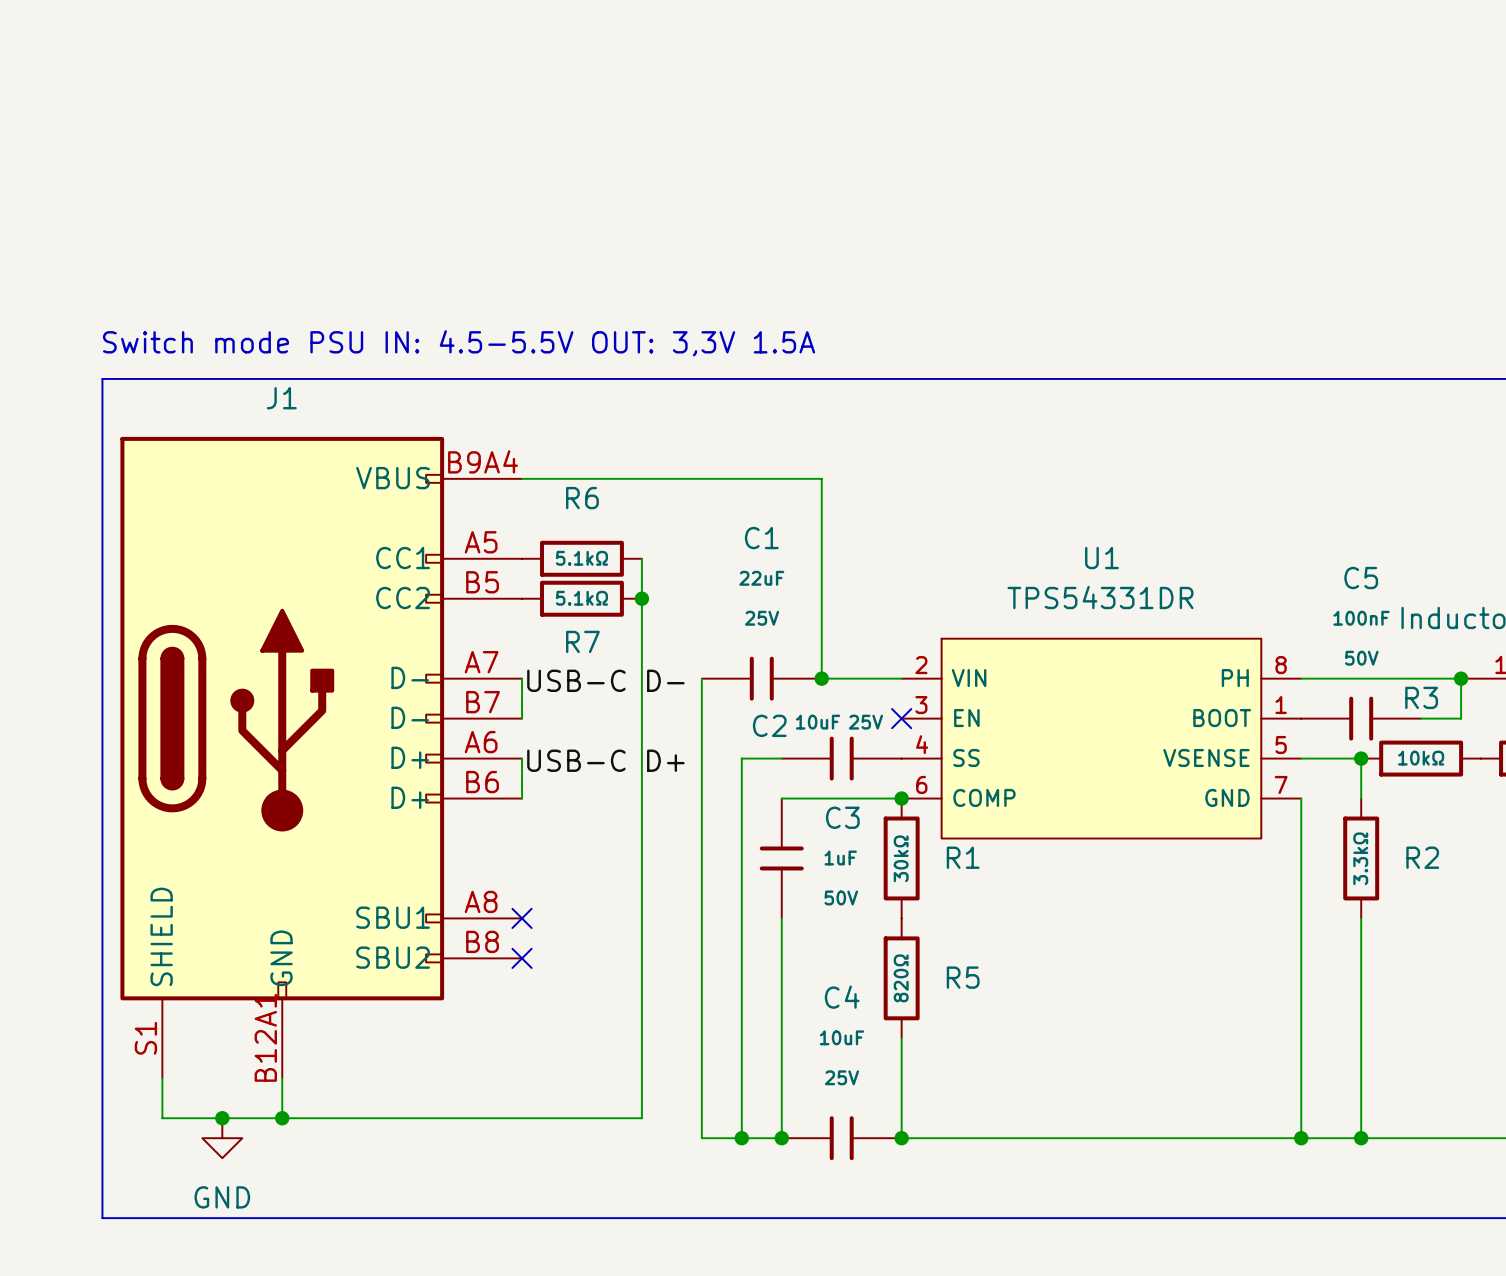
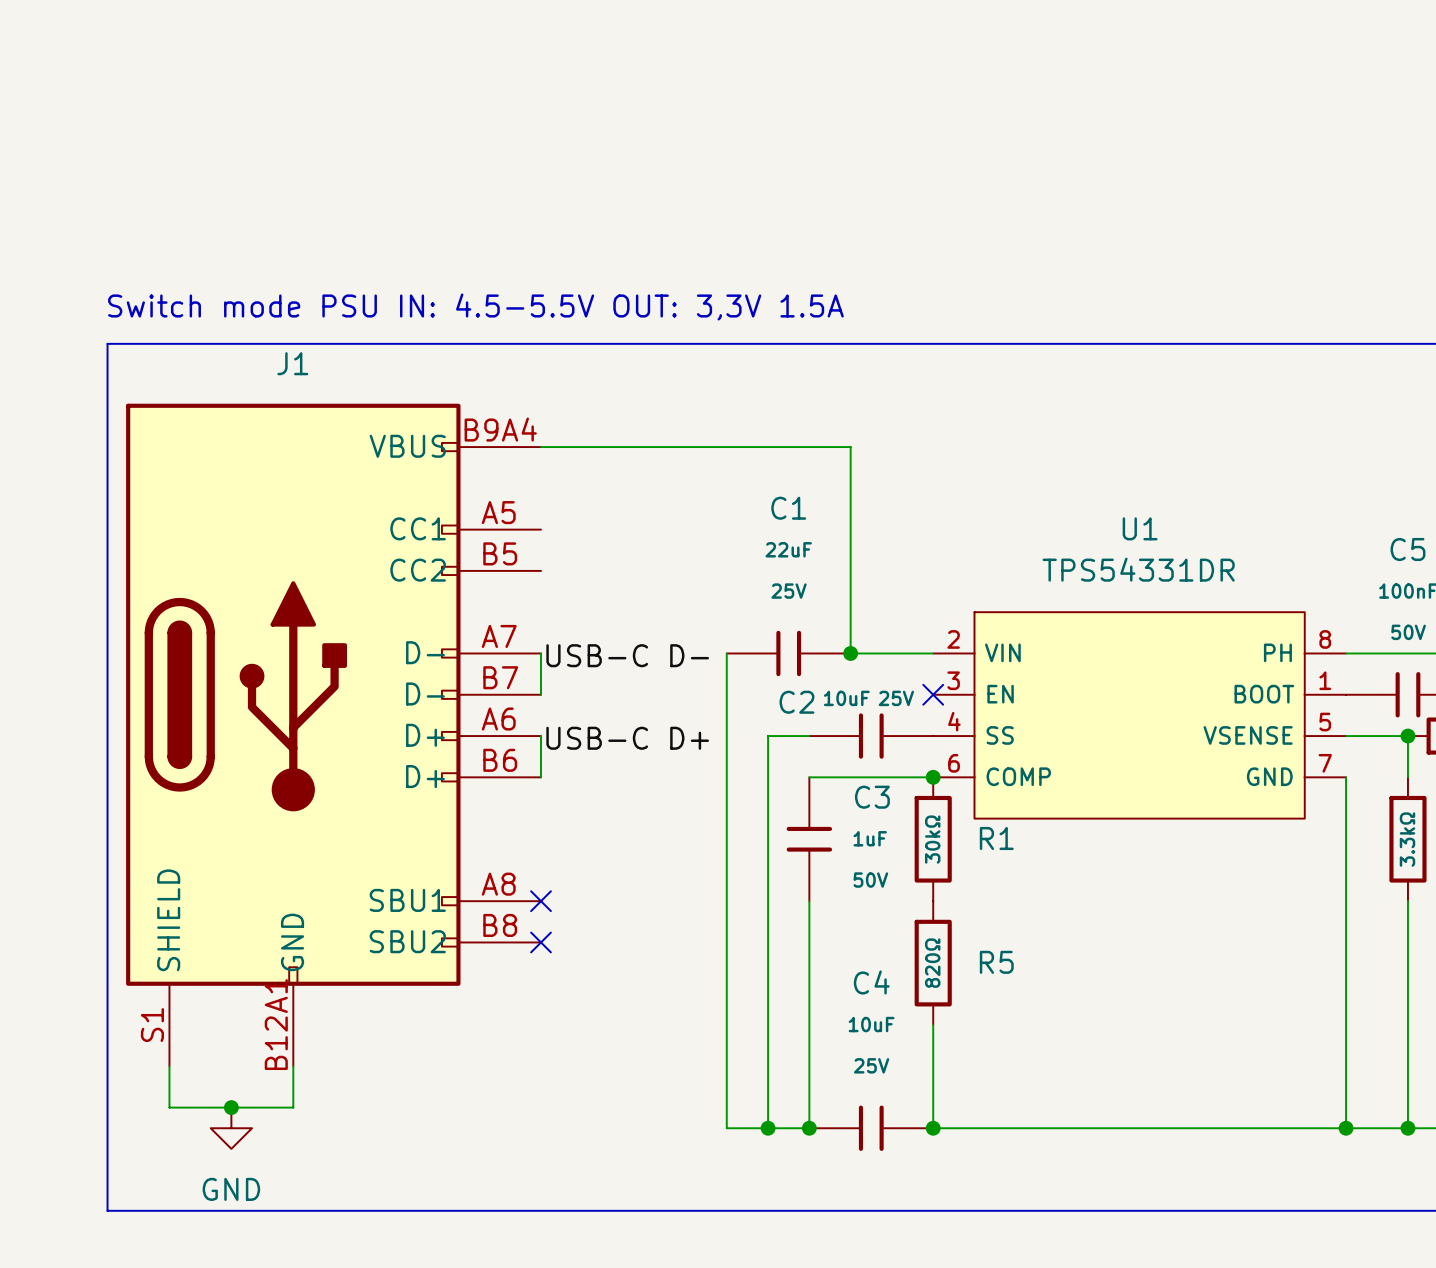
R6: 5.1kΩ (581, 558) -> none
wire: (641, 558) (641, 1118) (282, 1118) -> none
R7: 5.1kΩ (581, 598) -> none
junction: (641, 598) -> none
junction: (282, 1118) -> none

